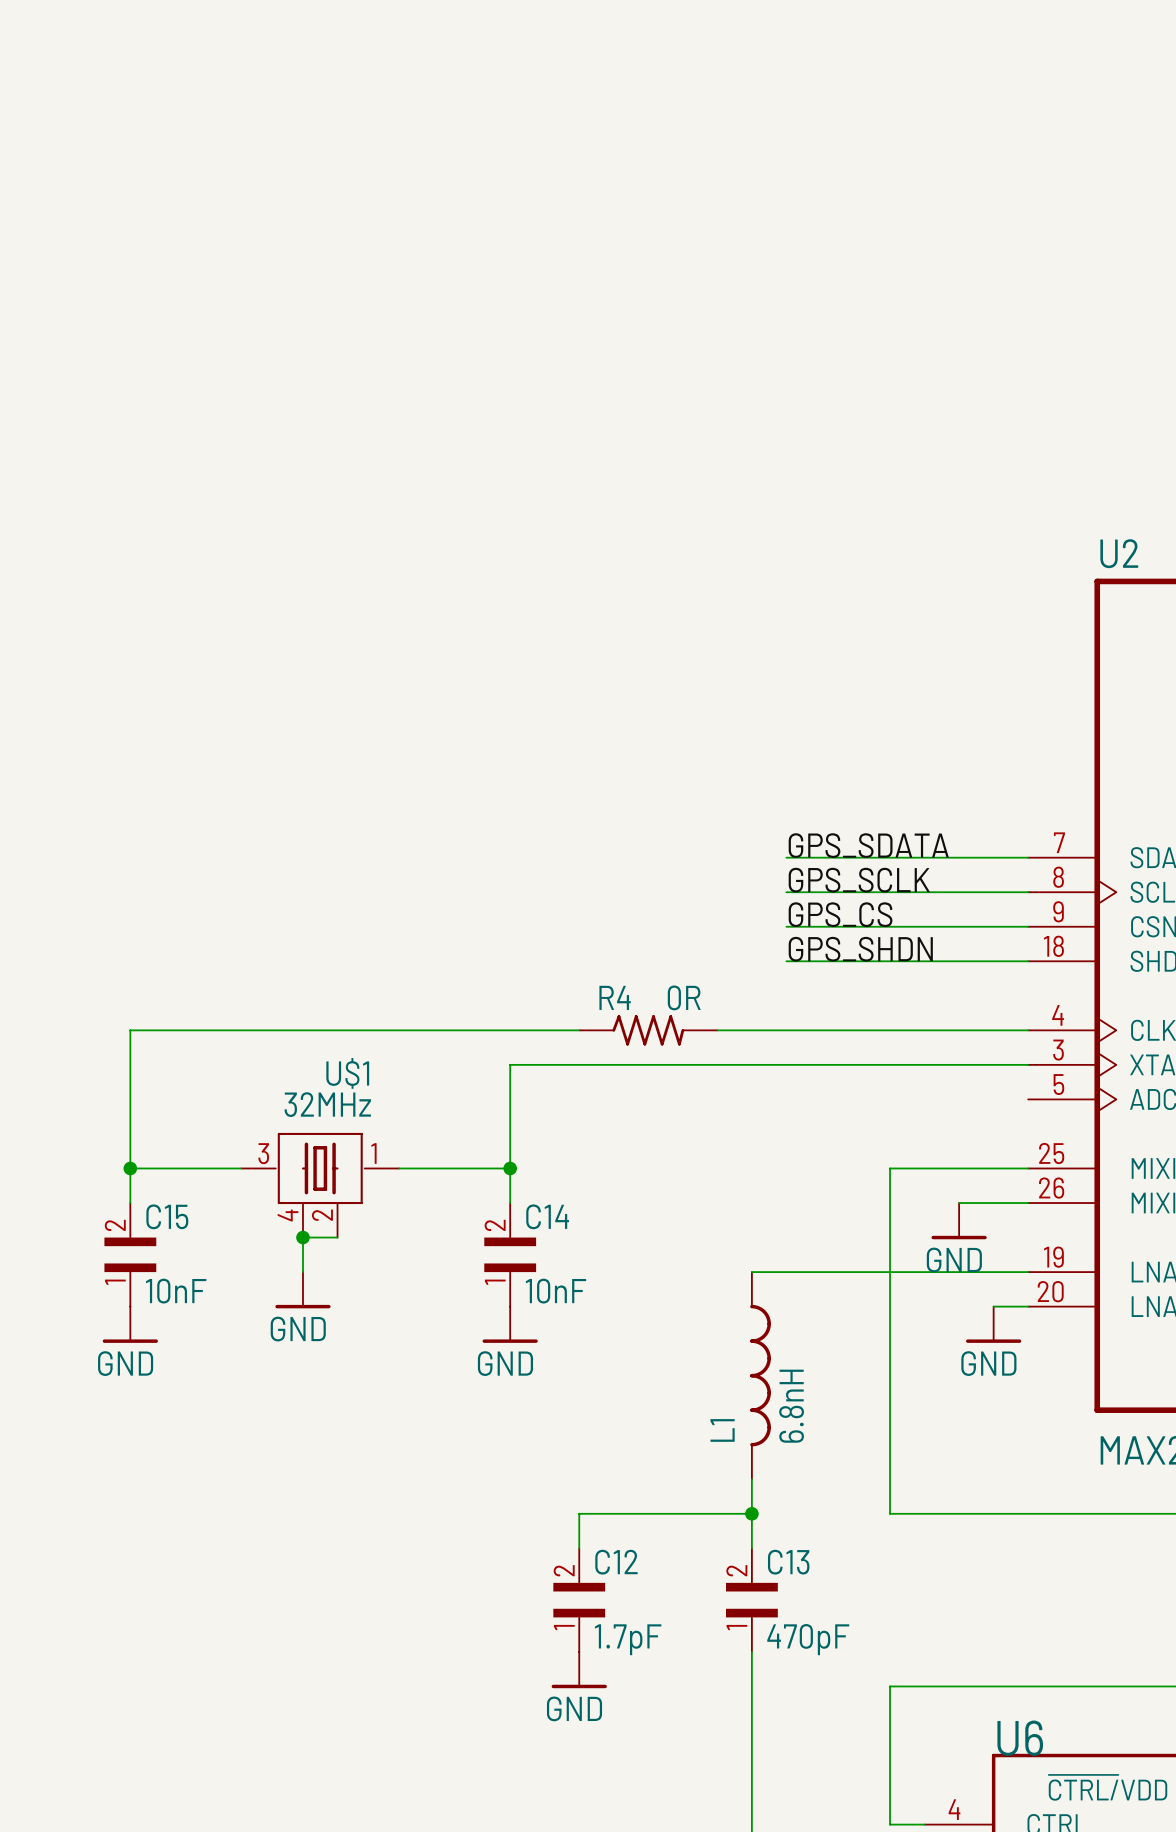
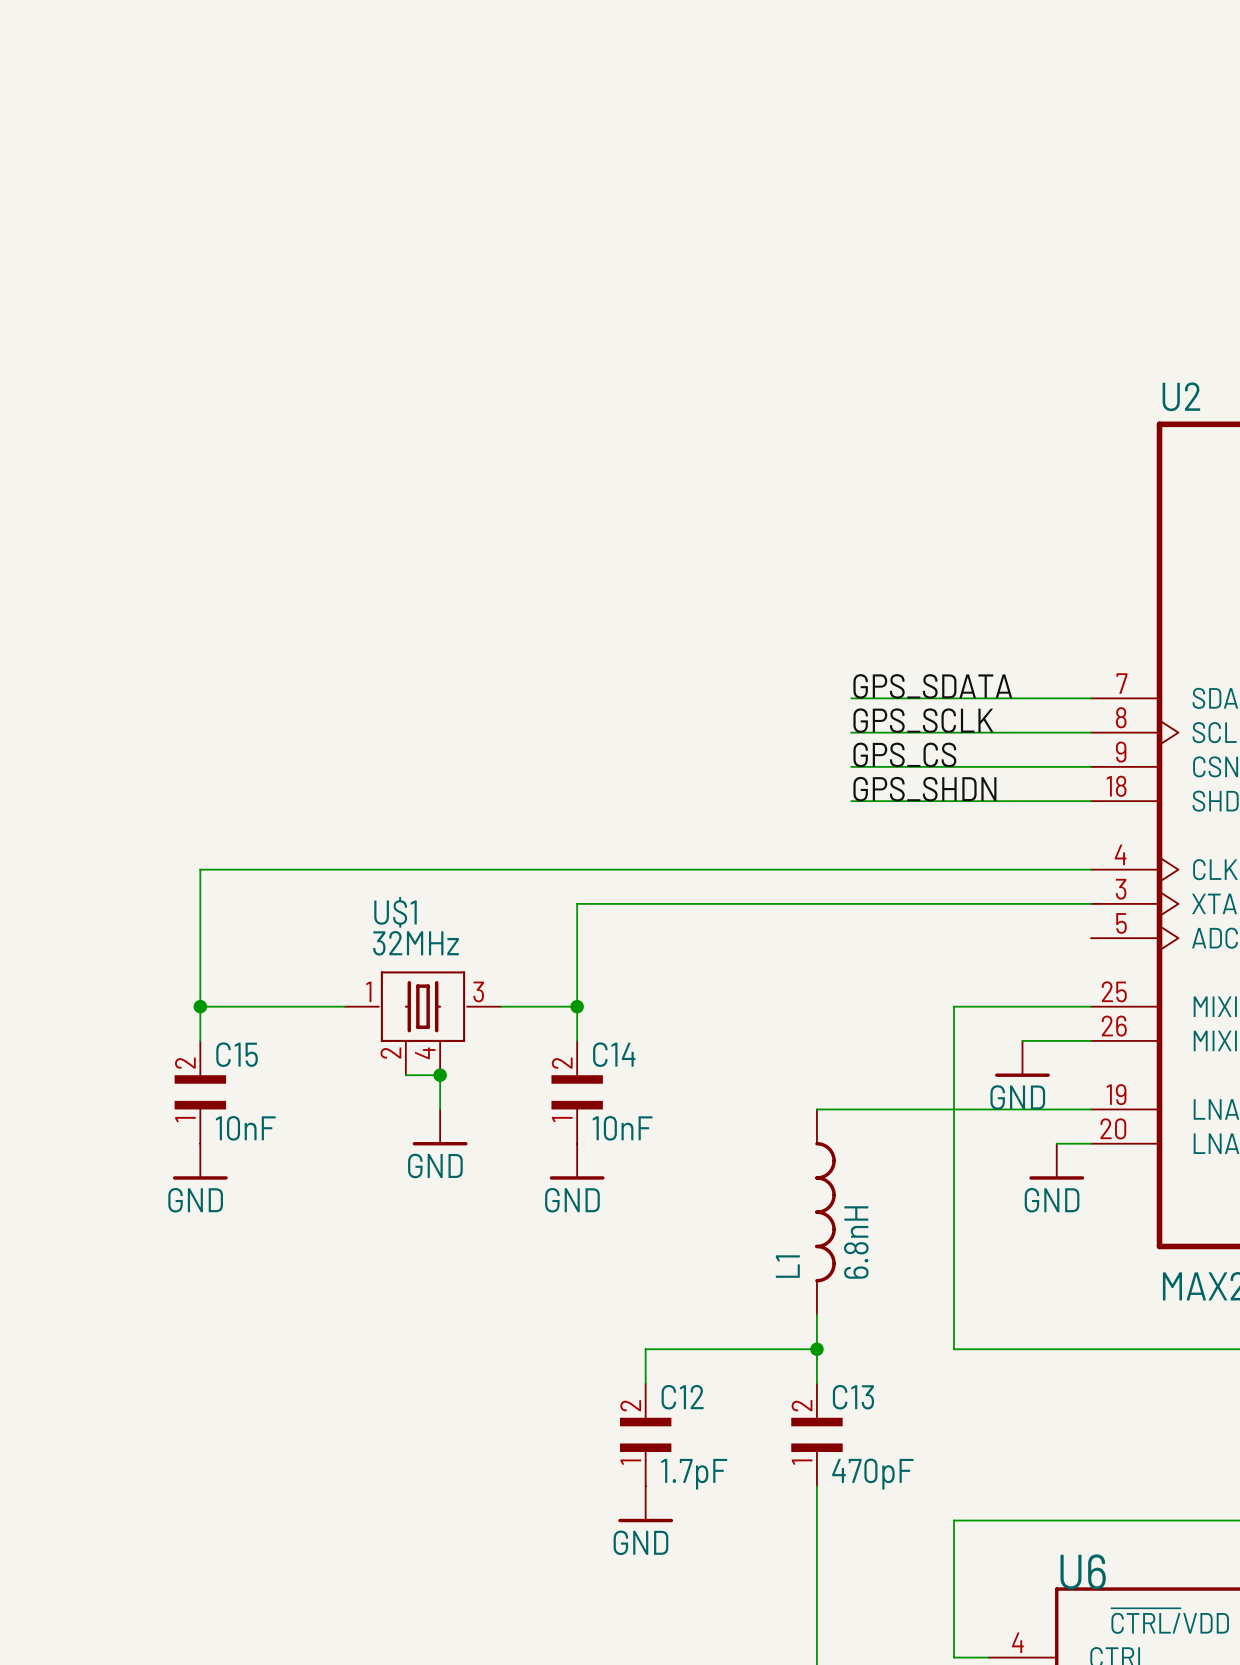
R4: 0R (648, 1030) -> none
U$1 flip: as is (320, 1168) -> left-right (422, 1006)
junction position: (302, 1237) -> (440, 1075)
wire: (337, 1237) (302, 1237) (302, 1272) -> (405, 1075) (440, 1075) (440, 1109)
power symbol position: GND (302, 1290) -> GND (440, 1127)

